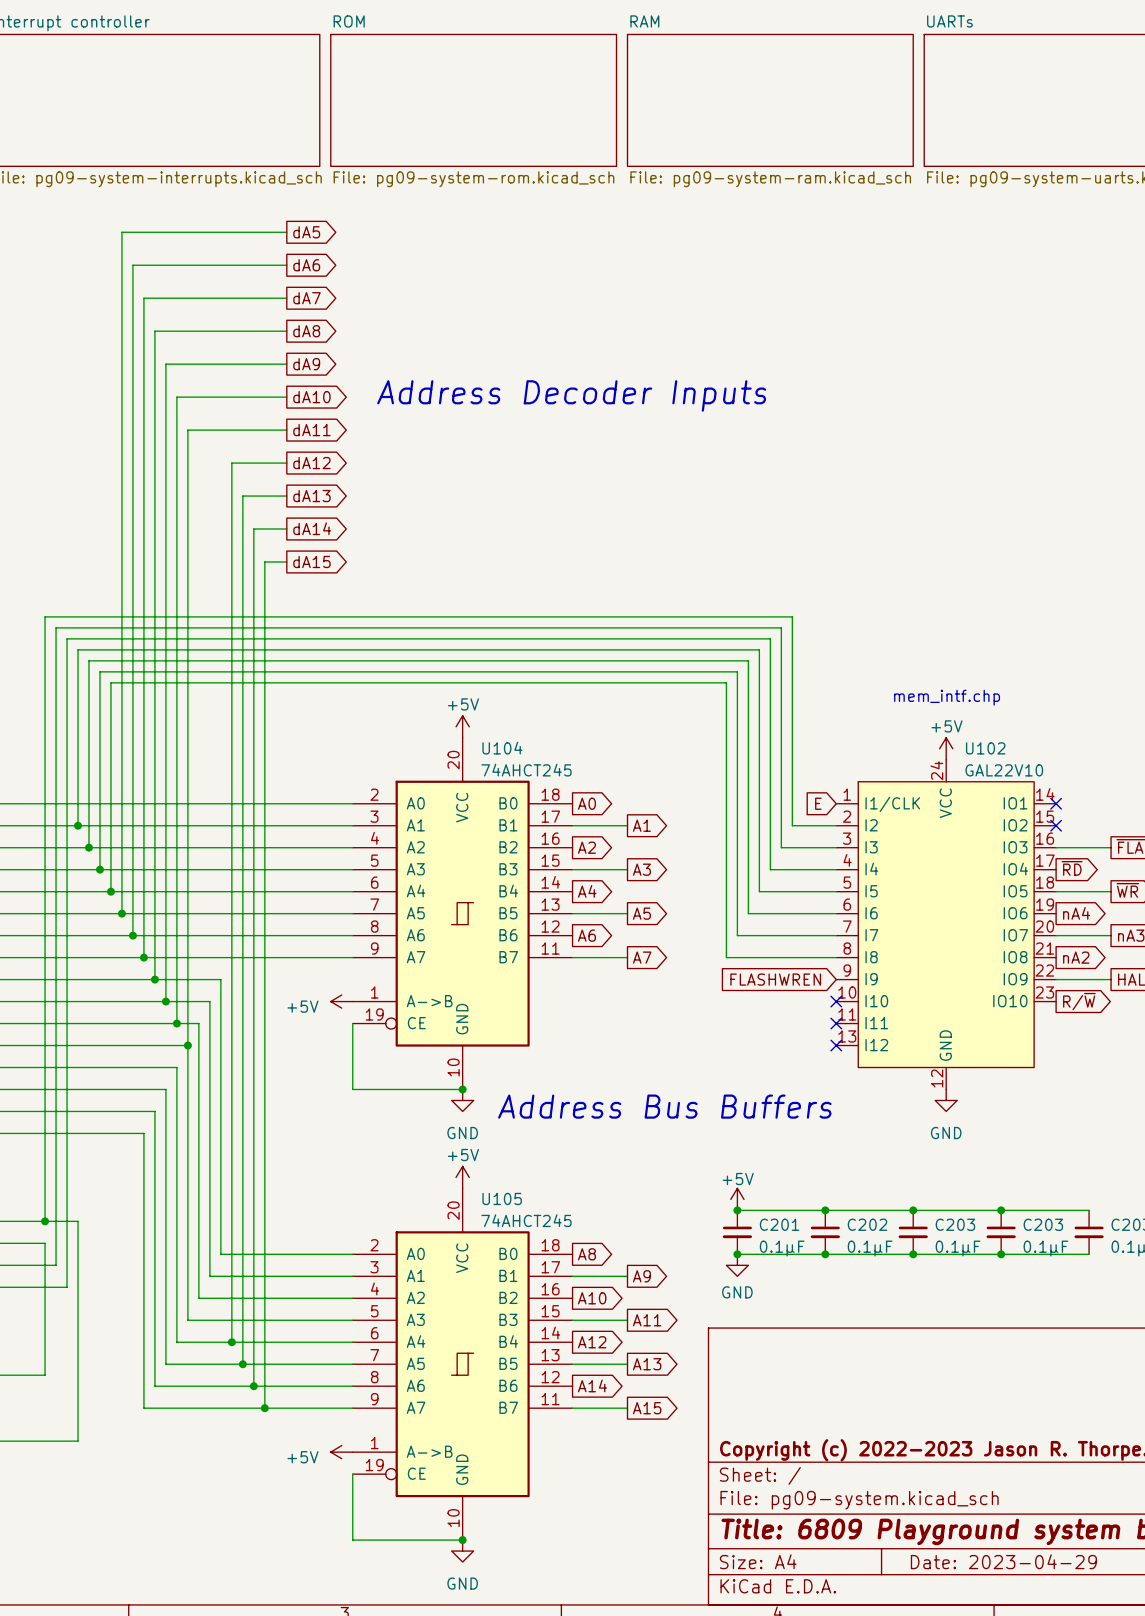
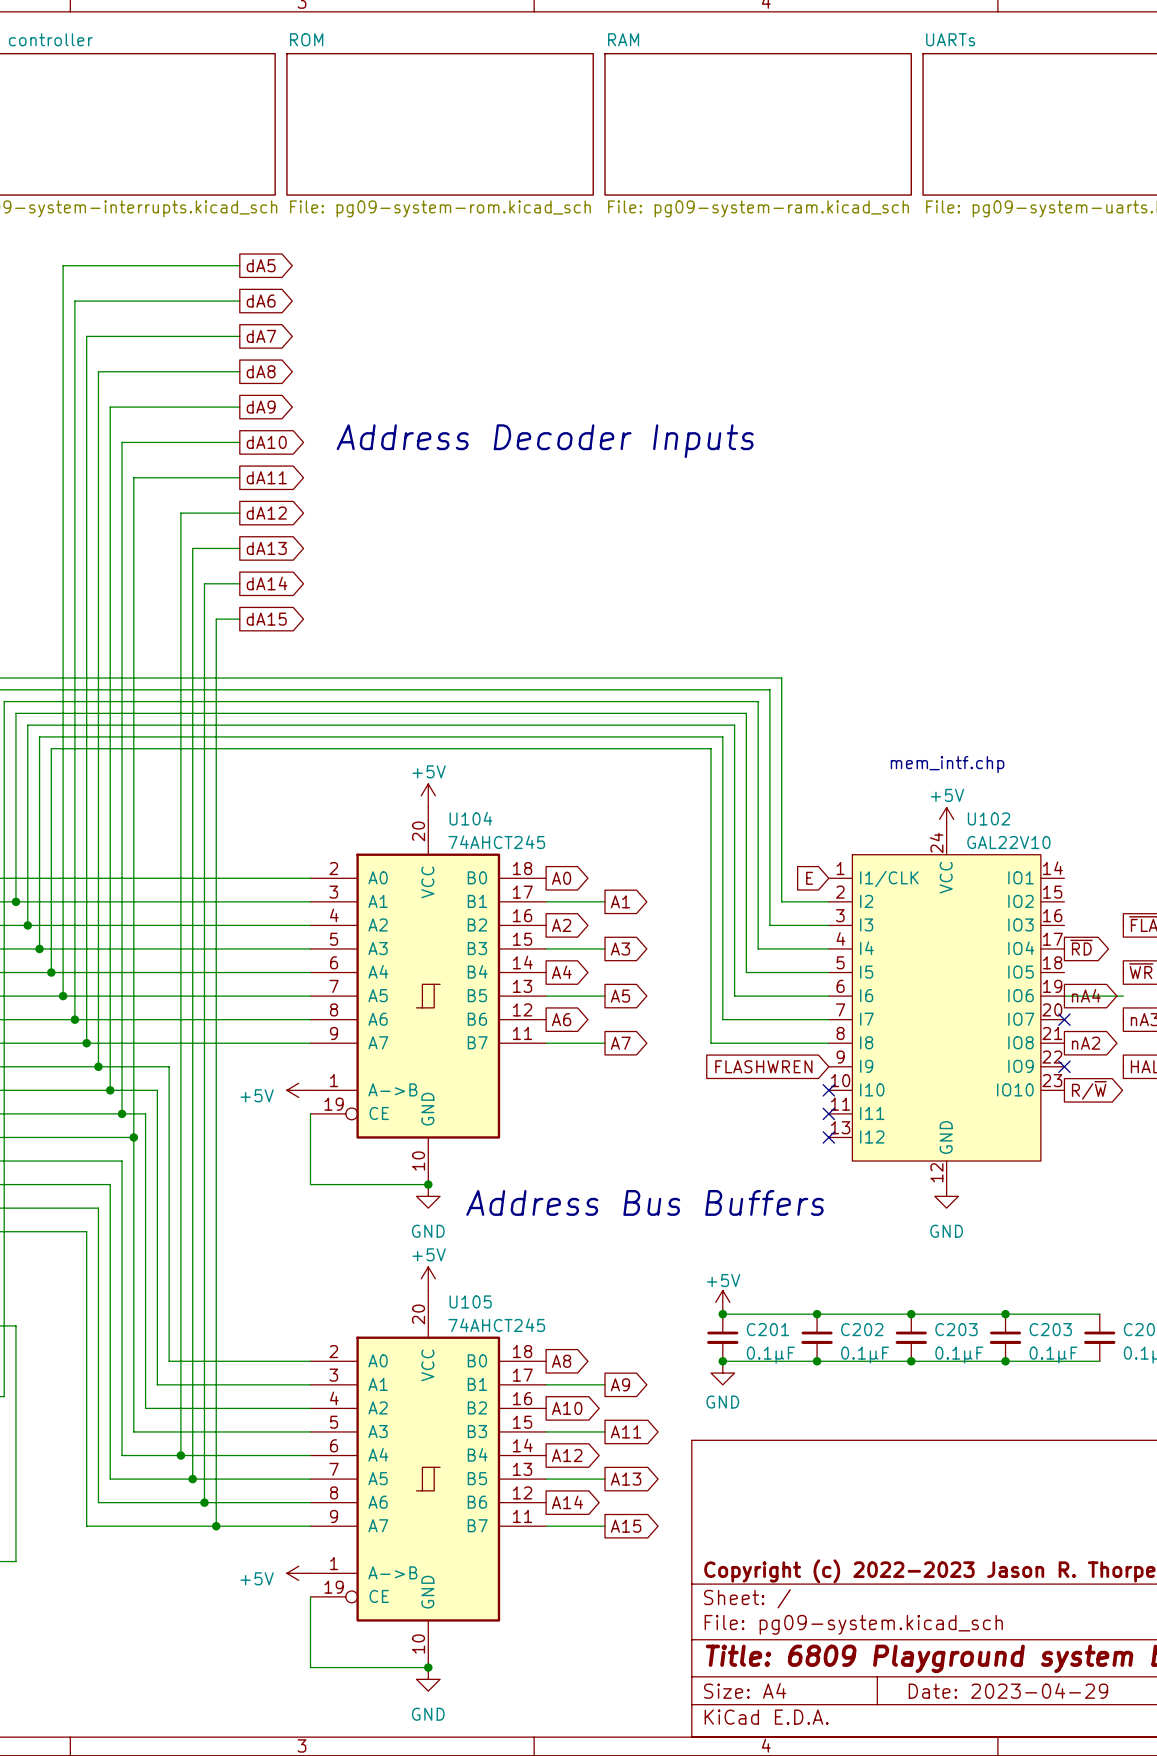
no-connect mark: (1056, 803) -> none
no-connect mark: (1056, 825) -> none
wire: (1056, 847) (1111, 847) -> none
wire: (1056, 891) (1111, 891) -> (1064, 996) (1123, 996)
wire: (1056, 935) (1111, 935) -> none
no-connect mark: none -> (1064, 1019)
wire: (1056, 979) (1111, 979) -> none
no-connect mark: none -> (1064, 1066)

